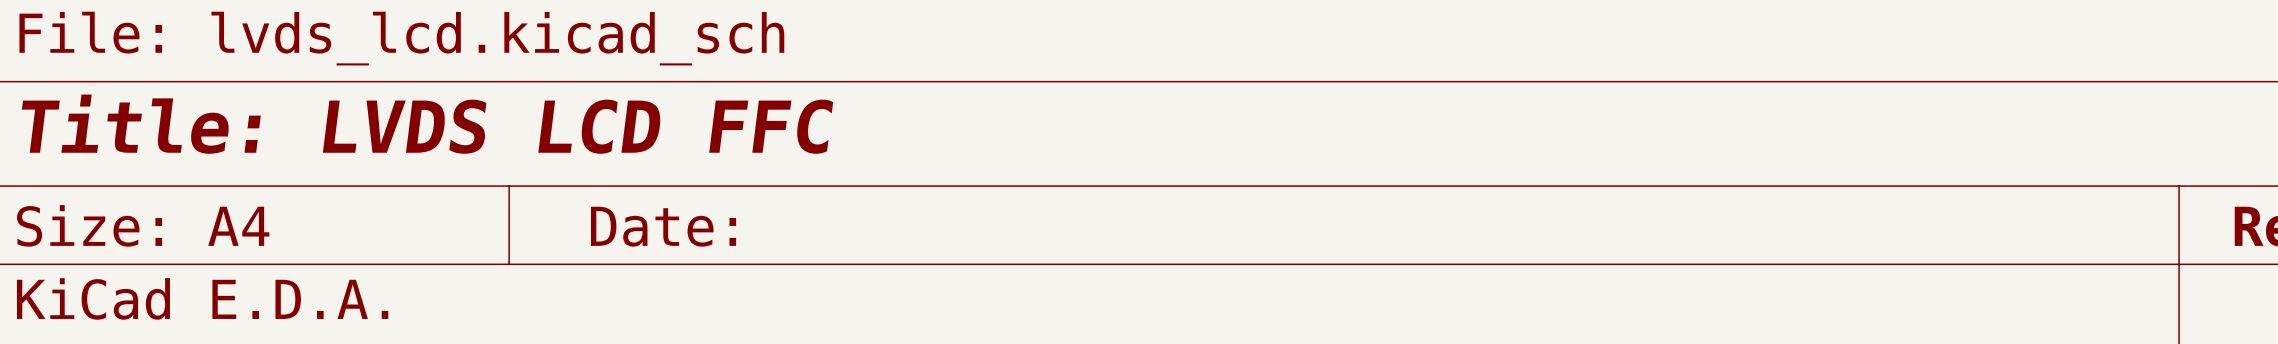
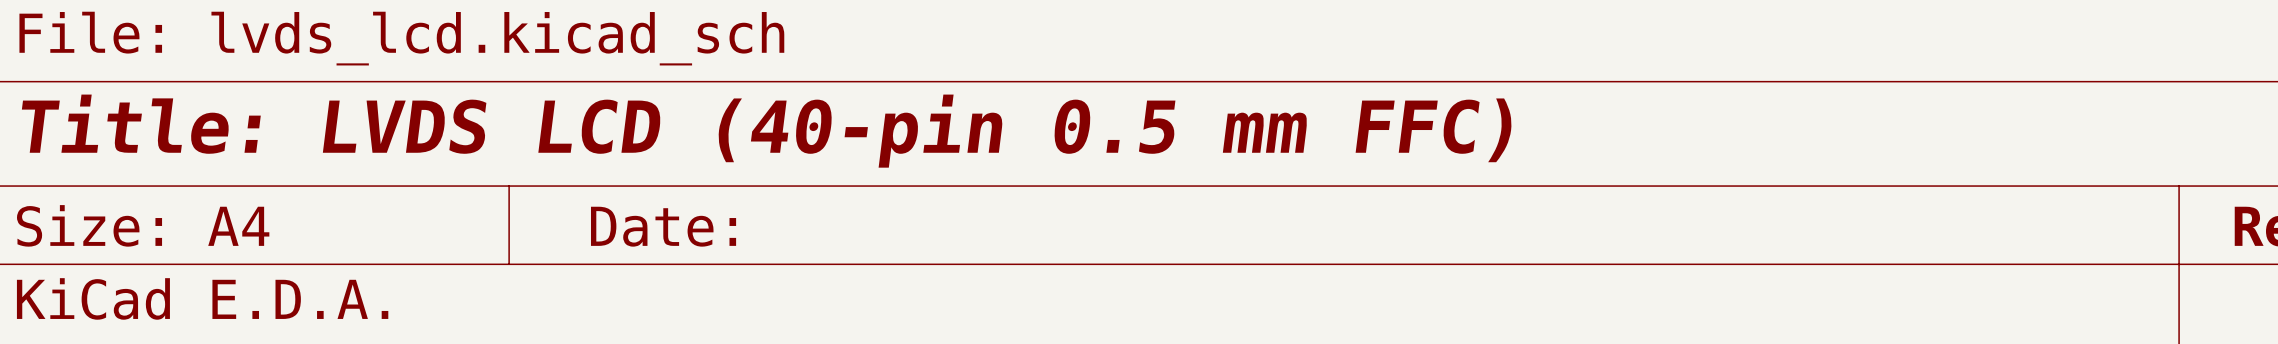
title block: Title: LVDS LCD FFC (427, 124) -> Title: LVDS LCD (40-pin 0.5 mm FFC) (766, 131)

